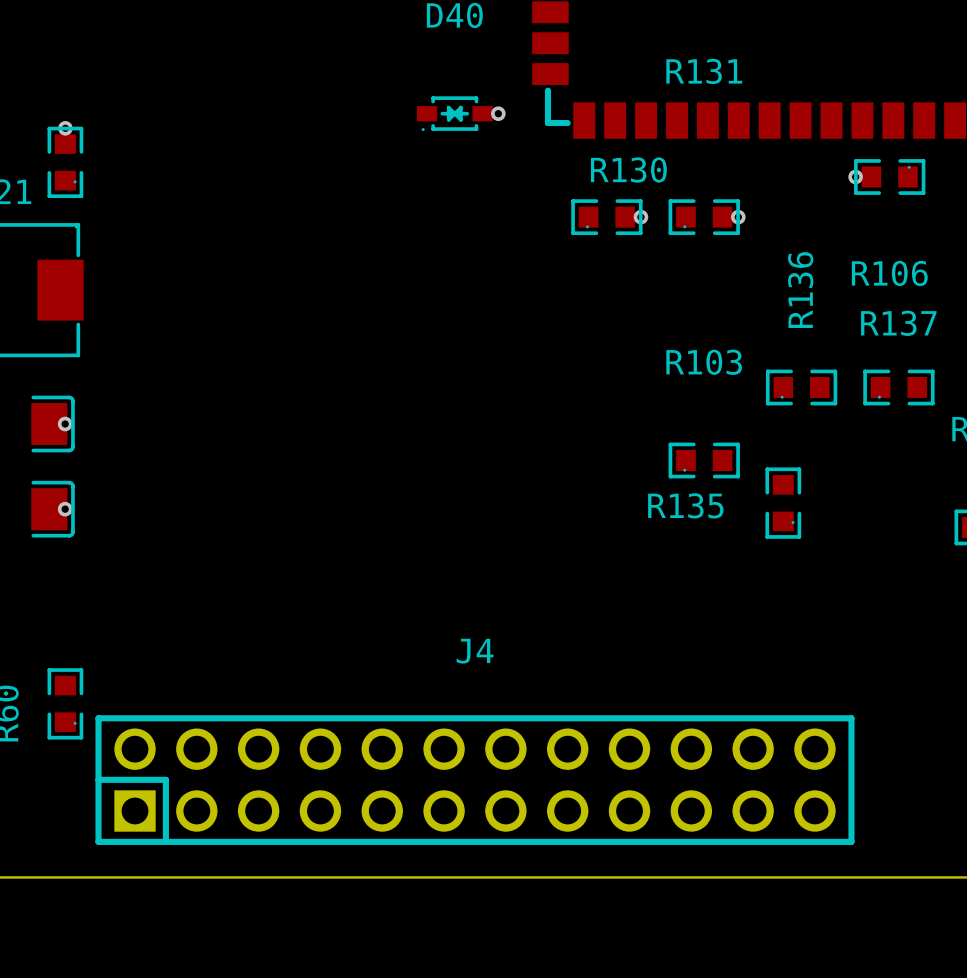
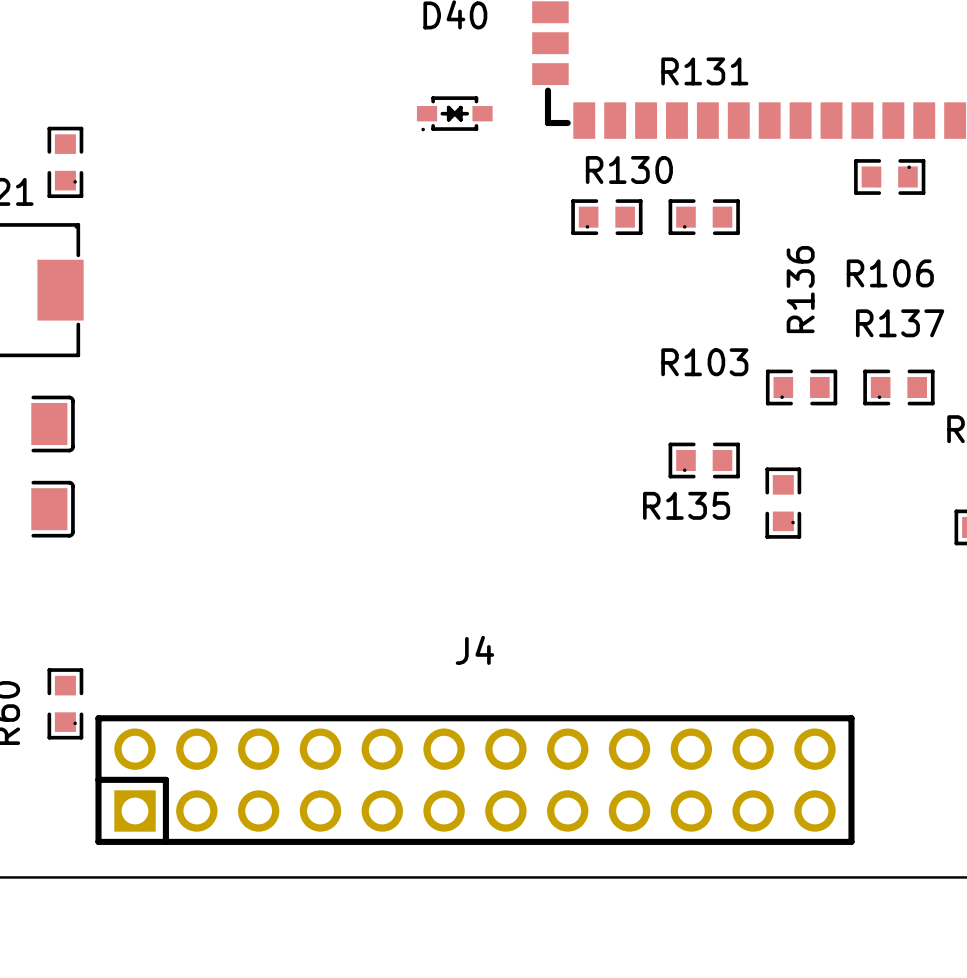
via: (498, 113) -> none
via: (65, 128) -> none
via: (855, 176) -> none
via: (640, 217) -> none
via: (738, 217) -> none
via: (65, 424) -> none
via: (65, 509) -> none

